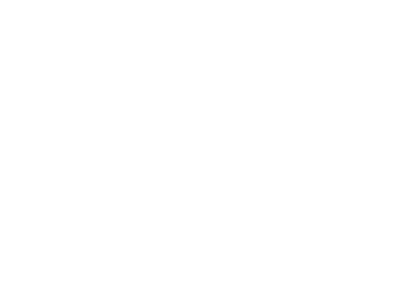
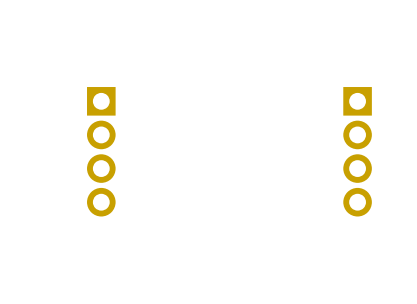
part: none -> (101, 151)
part: none -> (357, 151)

